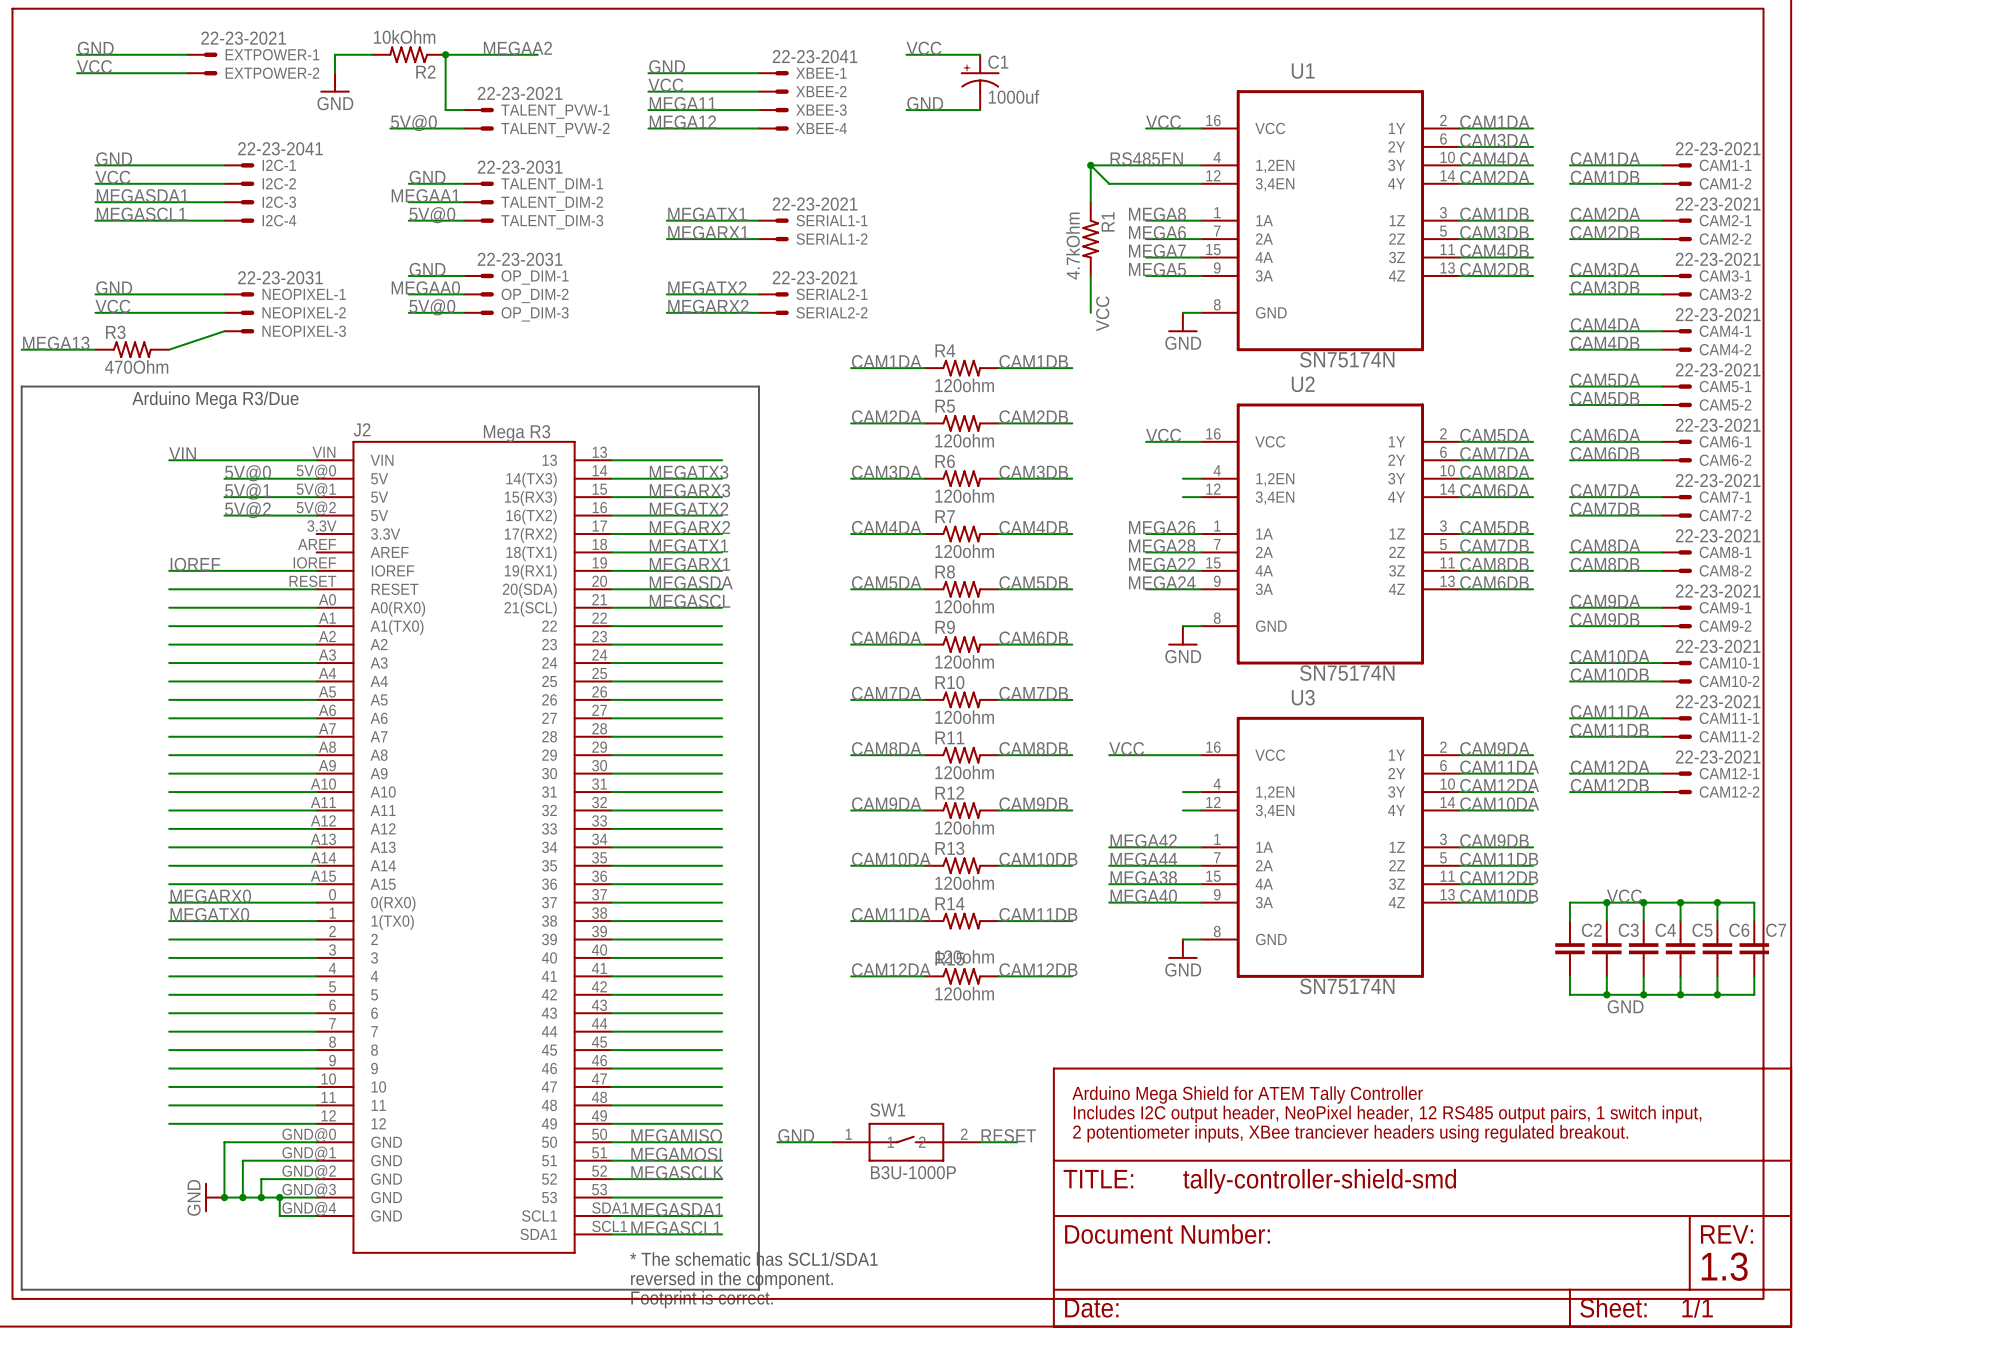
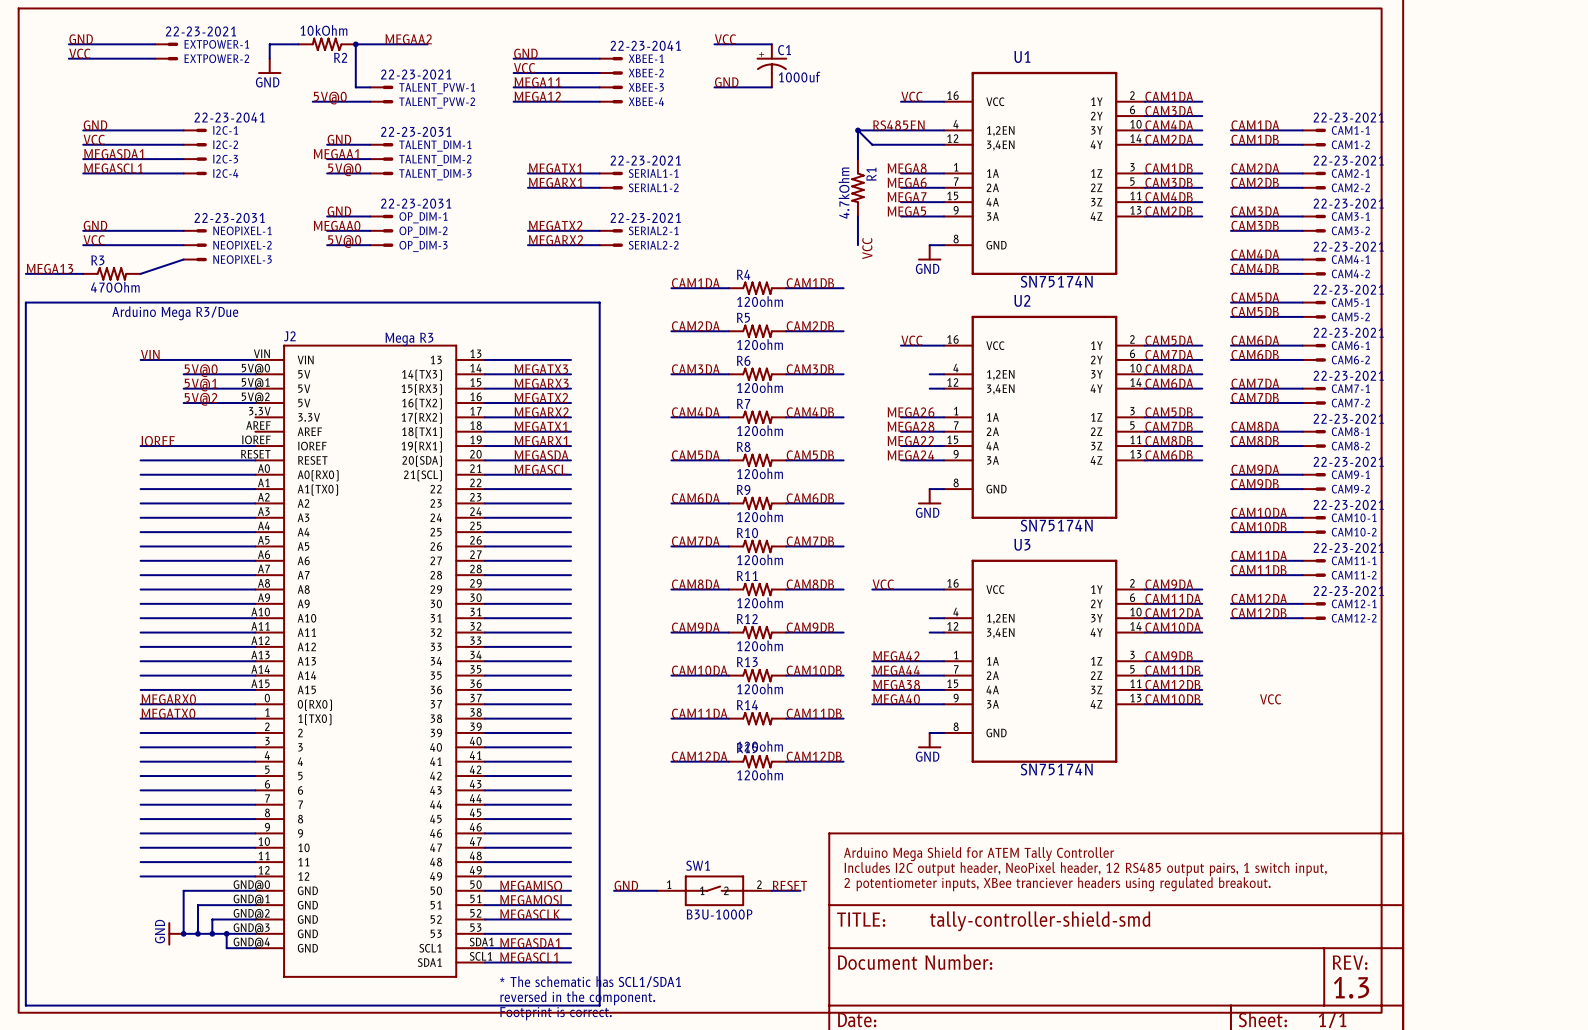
wire: (1606, 902) (1606, 921) -> none
junction: (1606, 902) -> none
wire: (1643, 902) (1643, 921) -> none
junction: (1643, 902) -> none
wire: (1680, 902) (1680, 921) -> none
junction: (1680, 902) -> none
wire: (1717, 902) (1717, 921) -> none
junction: (1717, 902) -> none
wire: (1569, 921) (1569, 902) (1754, 902) (1754, 921) -> none
C2: (1569, 948) -> none
C3: (1606, 948) -> none
C4: (1643, 948) -> none
C5: (1680, 948) -> none
C6: (1717, 948) -> none
C7: (1754, 948) -> none
wire: (1569, 976) (1569, 994) (1754, 994) (1754, 976) -> none
wire: (1606, 976) (1606, 994) -> none
wire: (1643, 976) (1643, 994) -> none
wire: (1680, 976) (1680, 994) -> none
wire: (1717, 976) (1717, 994) -> none
junction: (1606, 994) -> none
junction: (1643, 994) -> none
junction: (1680, 994) -> none
junction: (1717, 994) -> none
label: GND (1625, 1006) -> none

